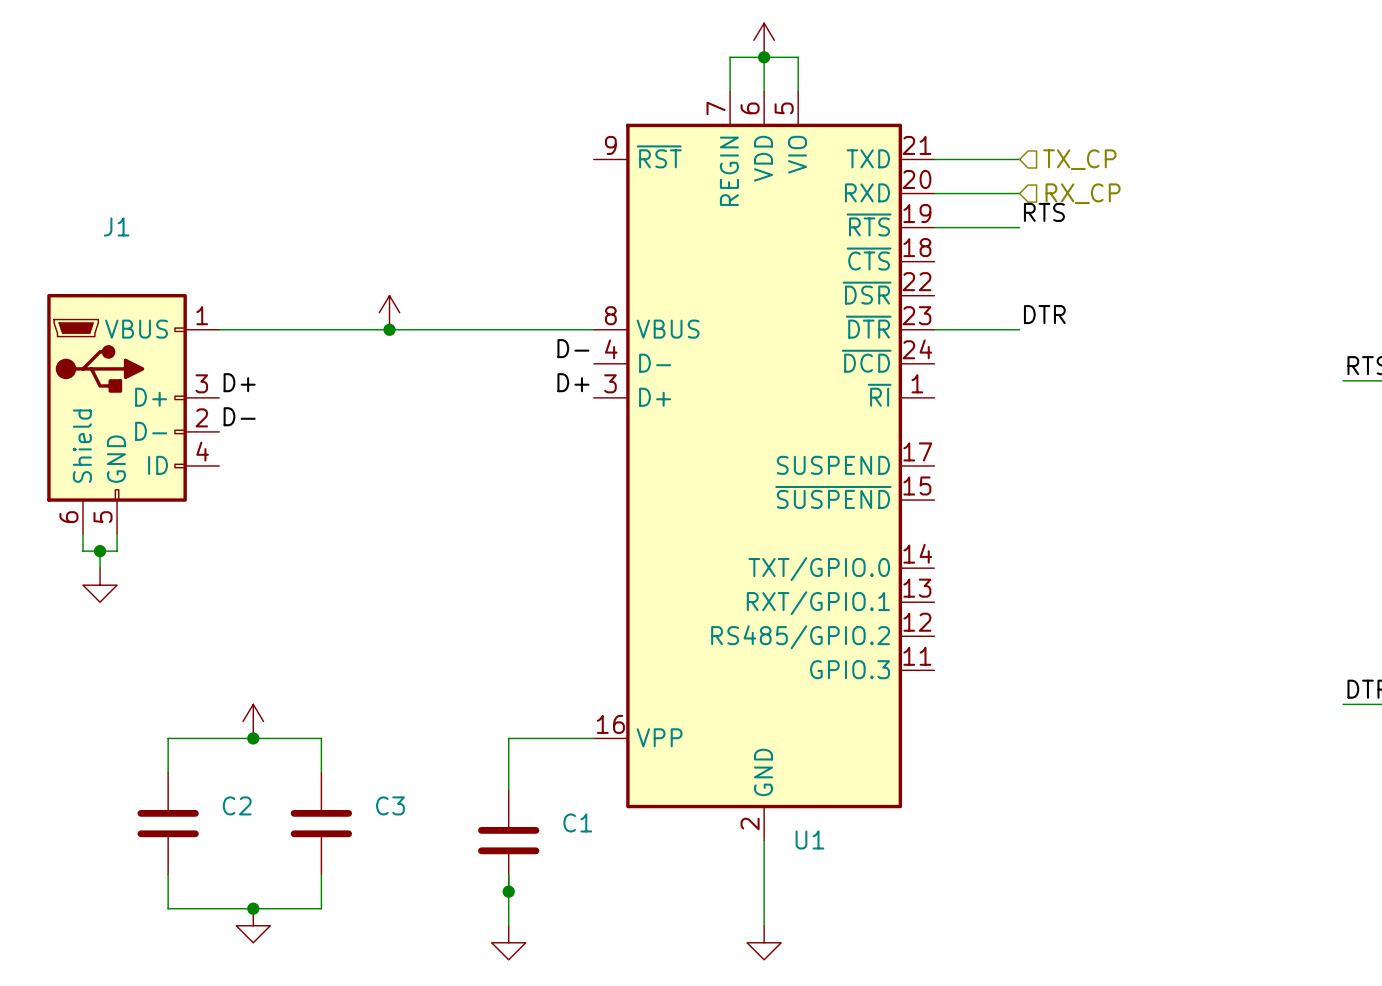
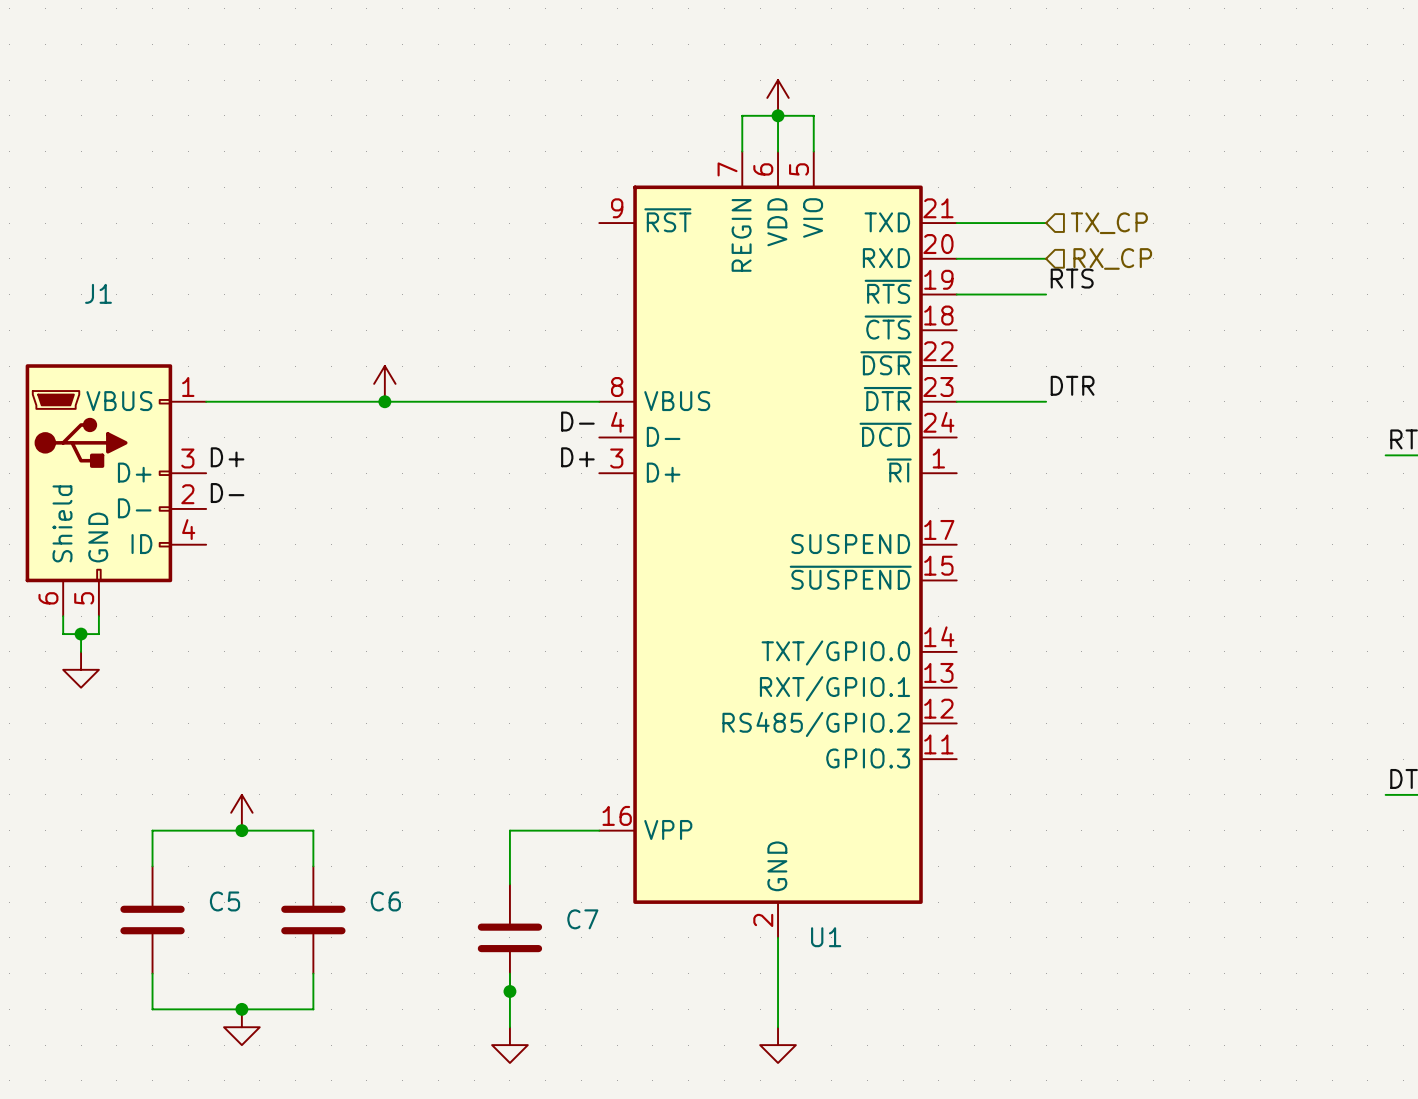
C2 name: C2 (237, 805) -> C5 (225, 901)
C3 name: C3 (390, 805) -> C6 (385, 901)
C1 name: C1 (577, 822) -> C7 (582, 919)

